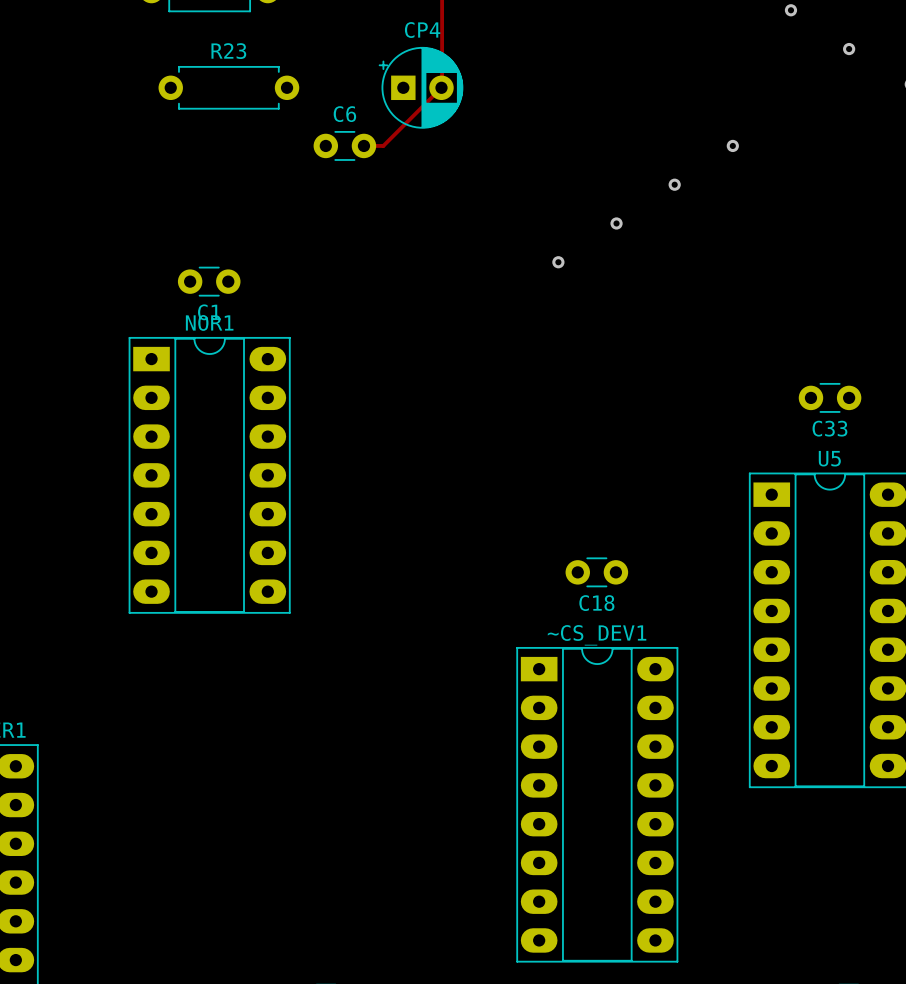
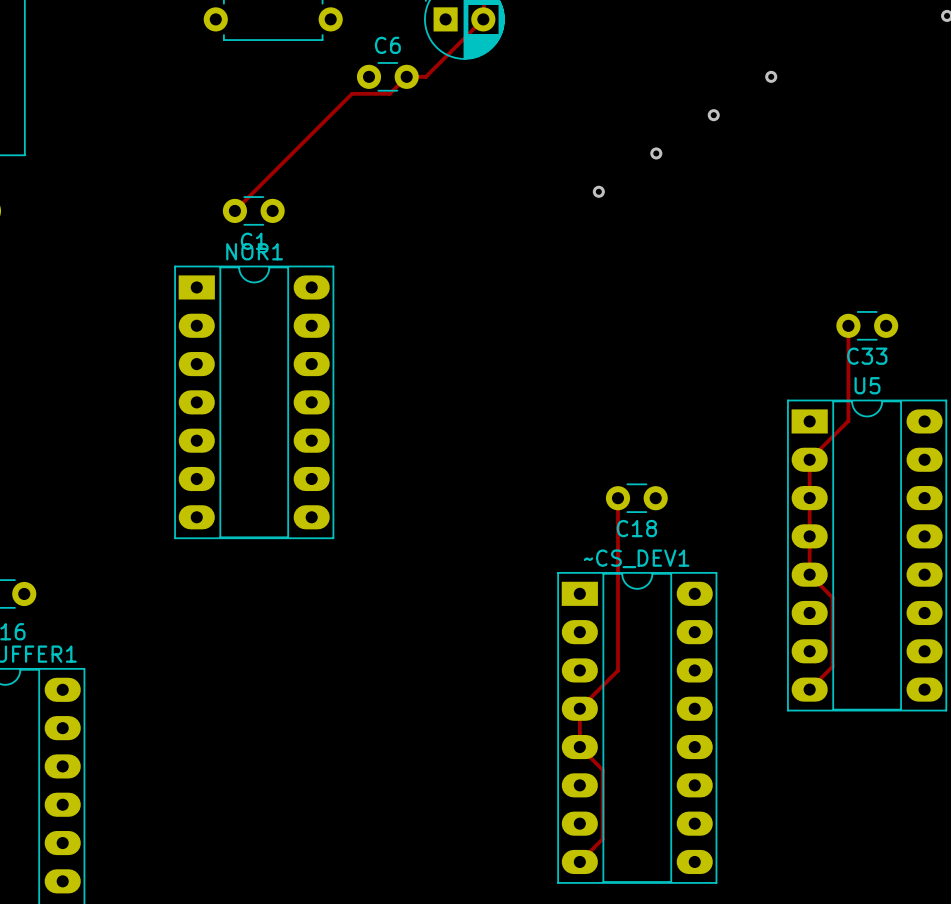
top track: none -> (406, 76) (389, 93) (352, 93) (234, 210)
top track: none -> (848, 325) (848, 421) (809, 459) (809, 574) (832, 597) (832, 666) (809, 689)
top track: none -> (617, 498) (617, 670) (579, 708) (579, 747) (602, 770) (602, 838) (579, 861)

